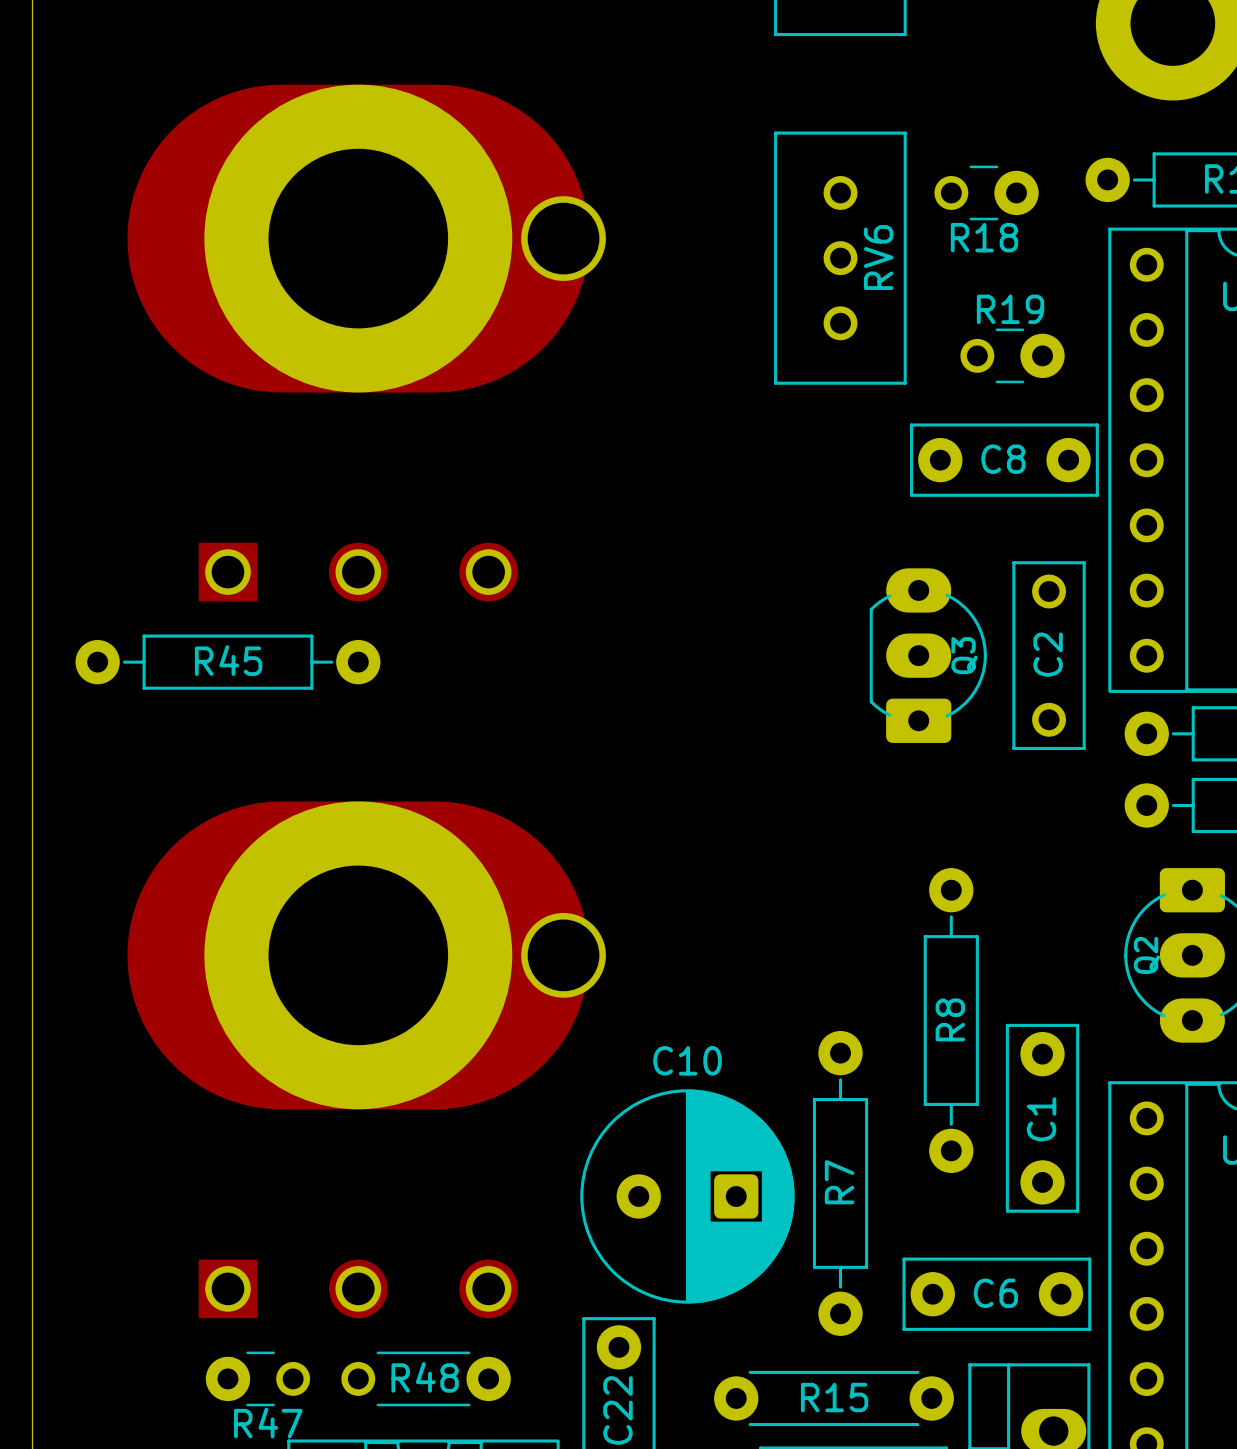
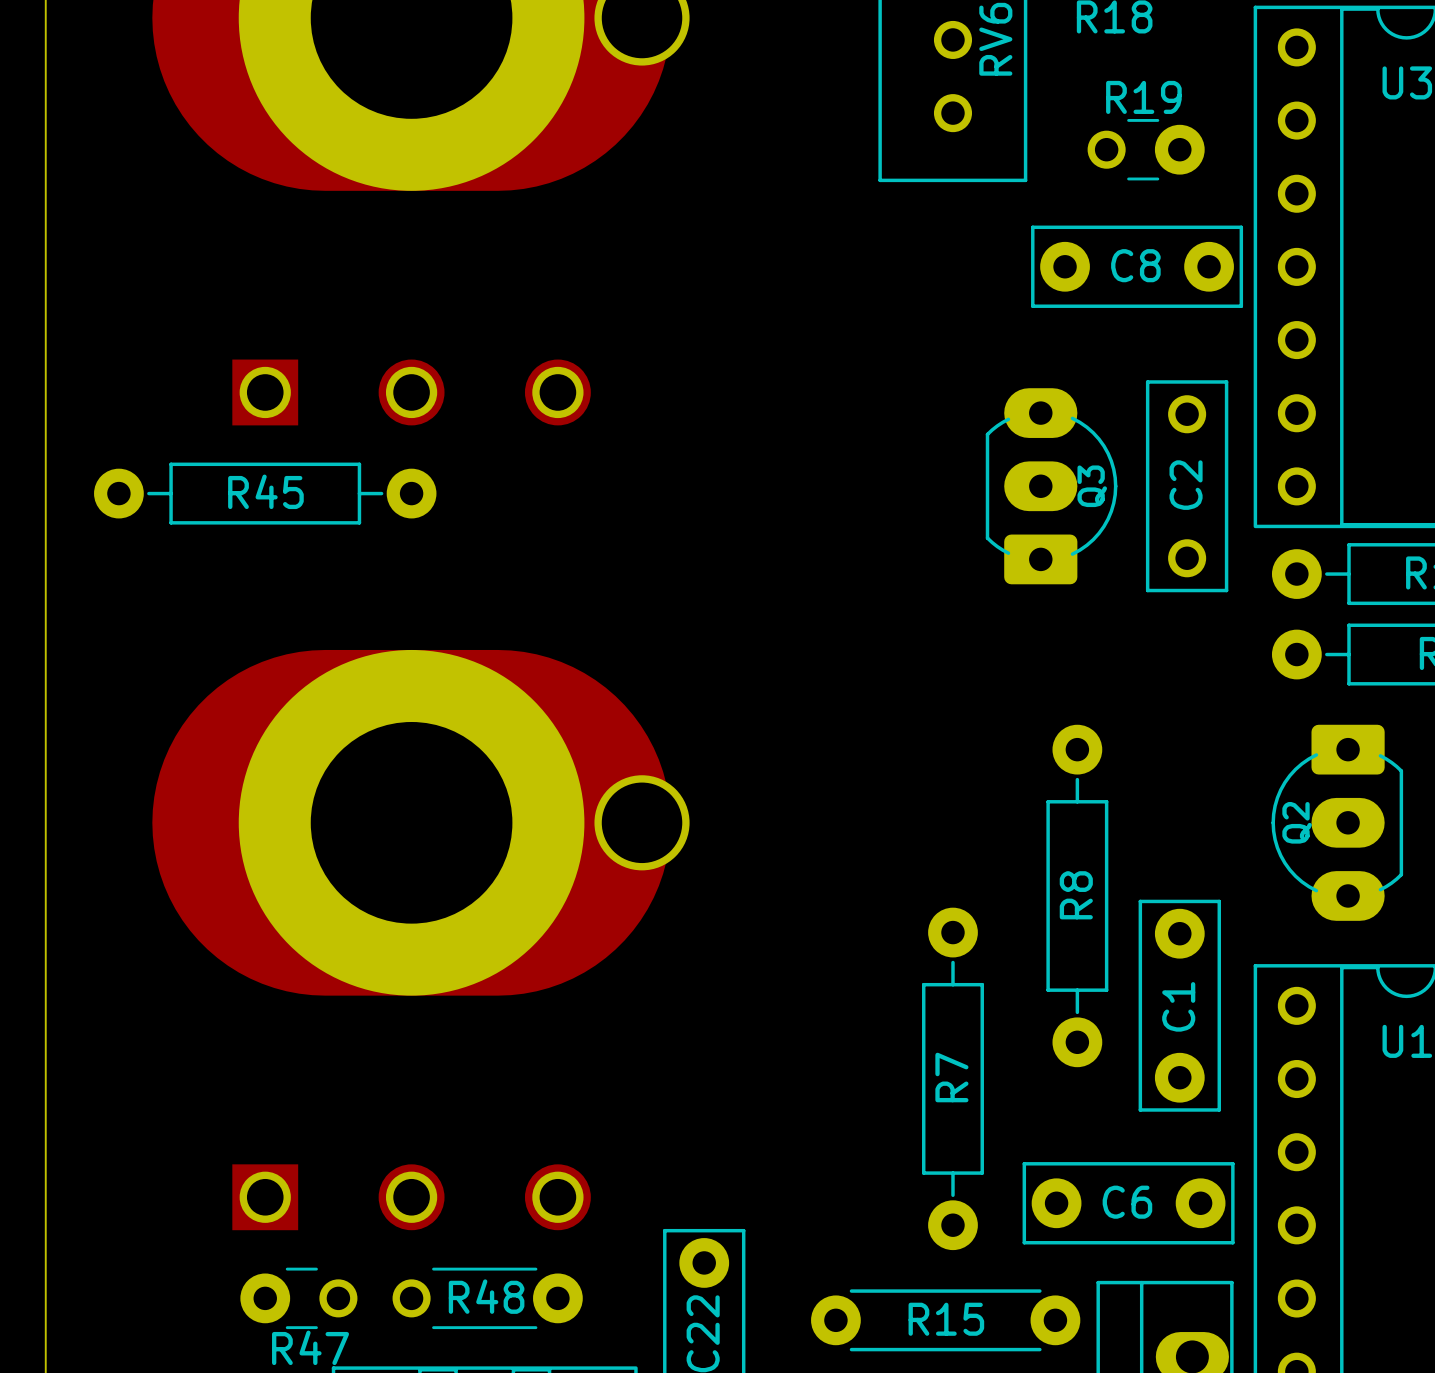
C10: (687, 1196) -> none

